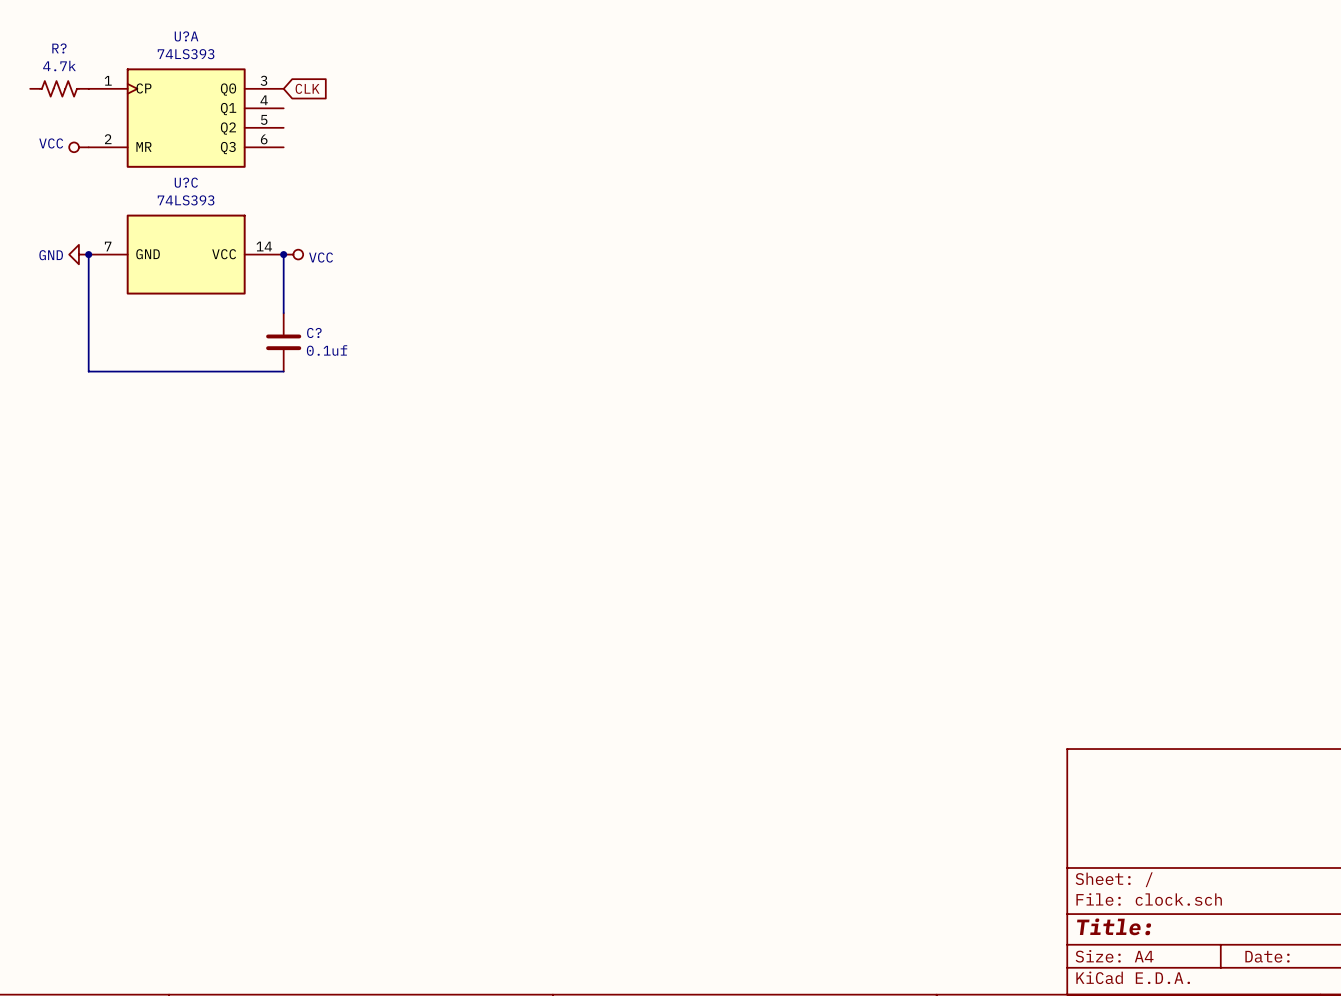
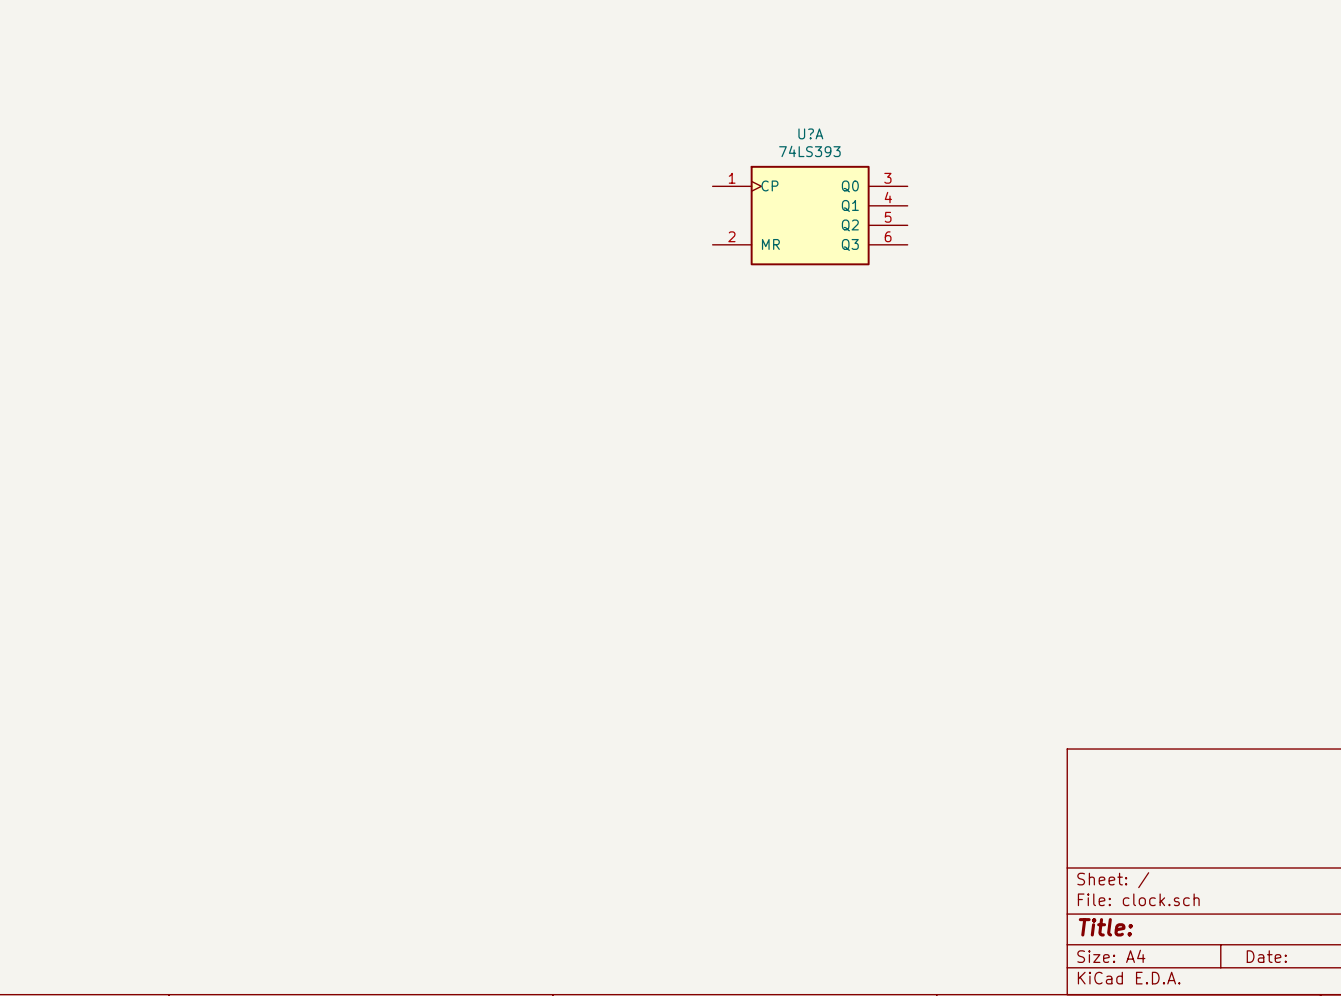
R?: 4.7k (59, 88) -> none
global label: CLK (307, 88) -> none
U?A: 74LS393 (186, 118) -> none
power symbol: VCC (78, 147) -> none
U?A: none -> 74LS393 (810, 215)
power symbol: GND (78, 254) -> none
wire: (88, 254) (88, 371) (283, 371) -> none
junction: (88, 254) -> none
U?C: 74LS393 (186, 254) -> none
wire: (283, 254) (283, 313) -> none
junction: (283, 254) -> none
power symbol: VCC (293, 254) -> none
C?: 0.1uf (283, 342) -> none

